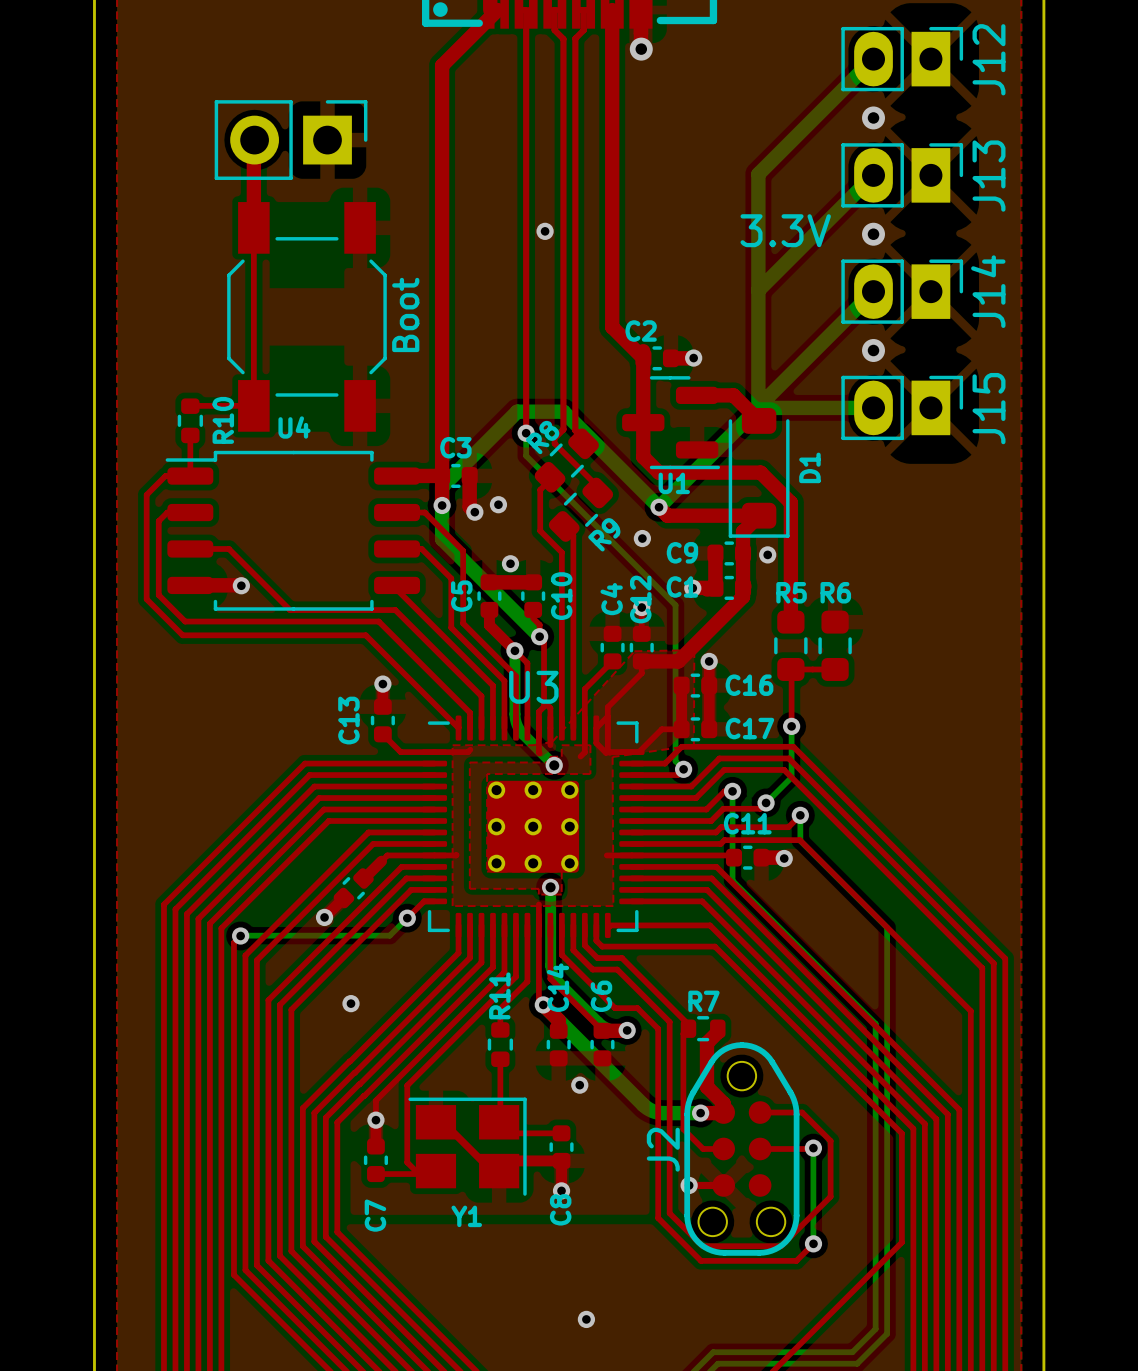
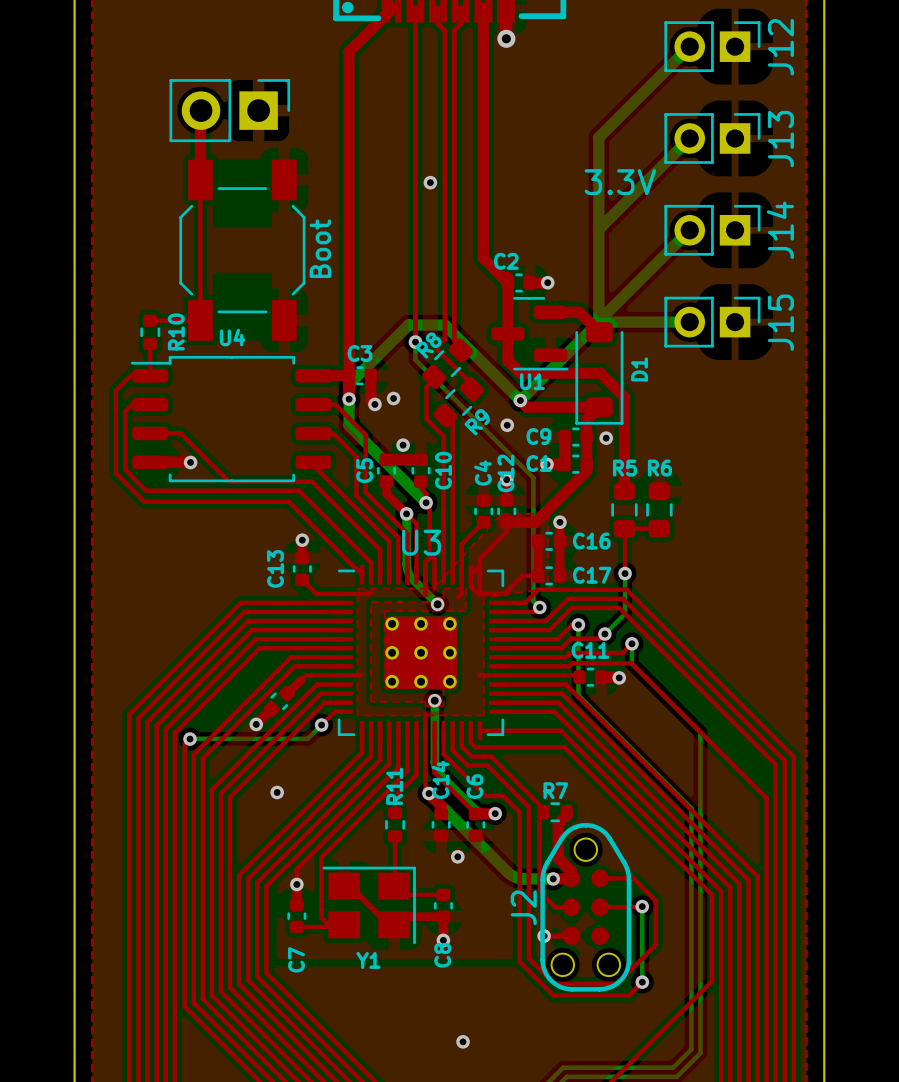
J12 footprint: [841, 26, 964, 92] -> [664, 21, 761, 73]
via: (873, 117) -> none
J13 footprint: [841, 143, 964, 208] -> [664, 113, 761, 164]
via: (873, 234) -> none
J14 footprint: [841, 259, 964, 324] -> [664, 204, 761, 256]
via: (873, 350) -> none
J15 footprint: [841, 375, 964, 441] -> [664, 296, 761, 348]

